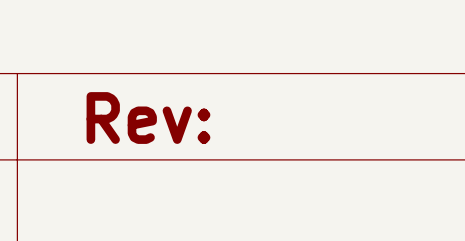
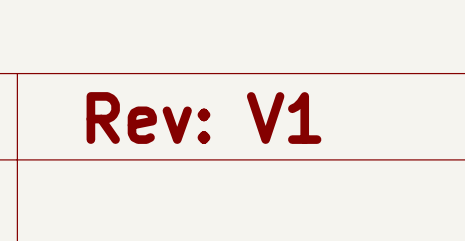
title block: Rev: (148, 118) -> Rev: V1 (203, 118)

